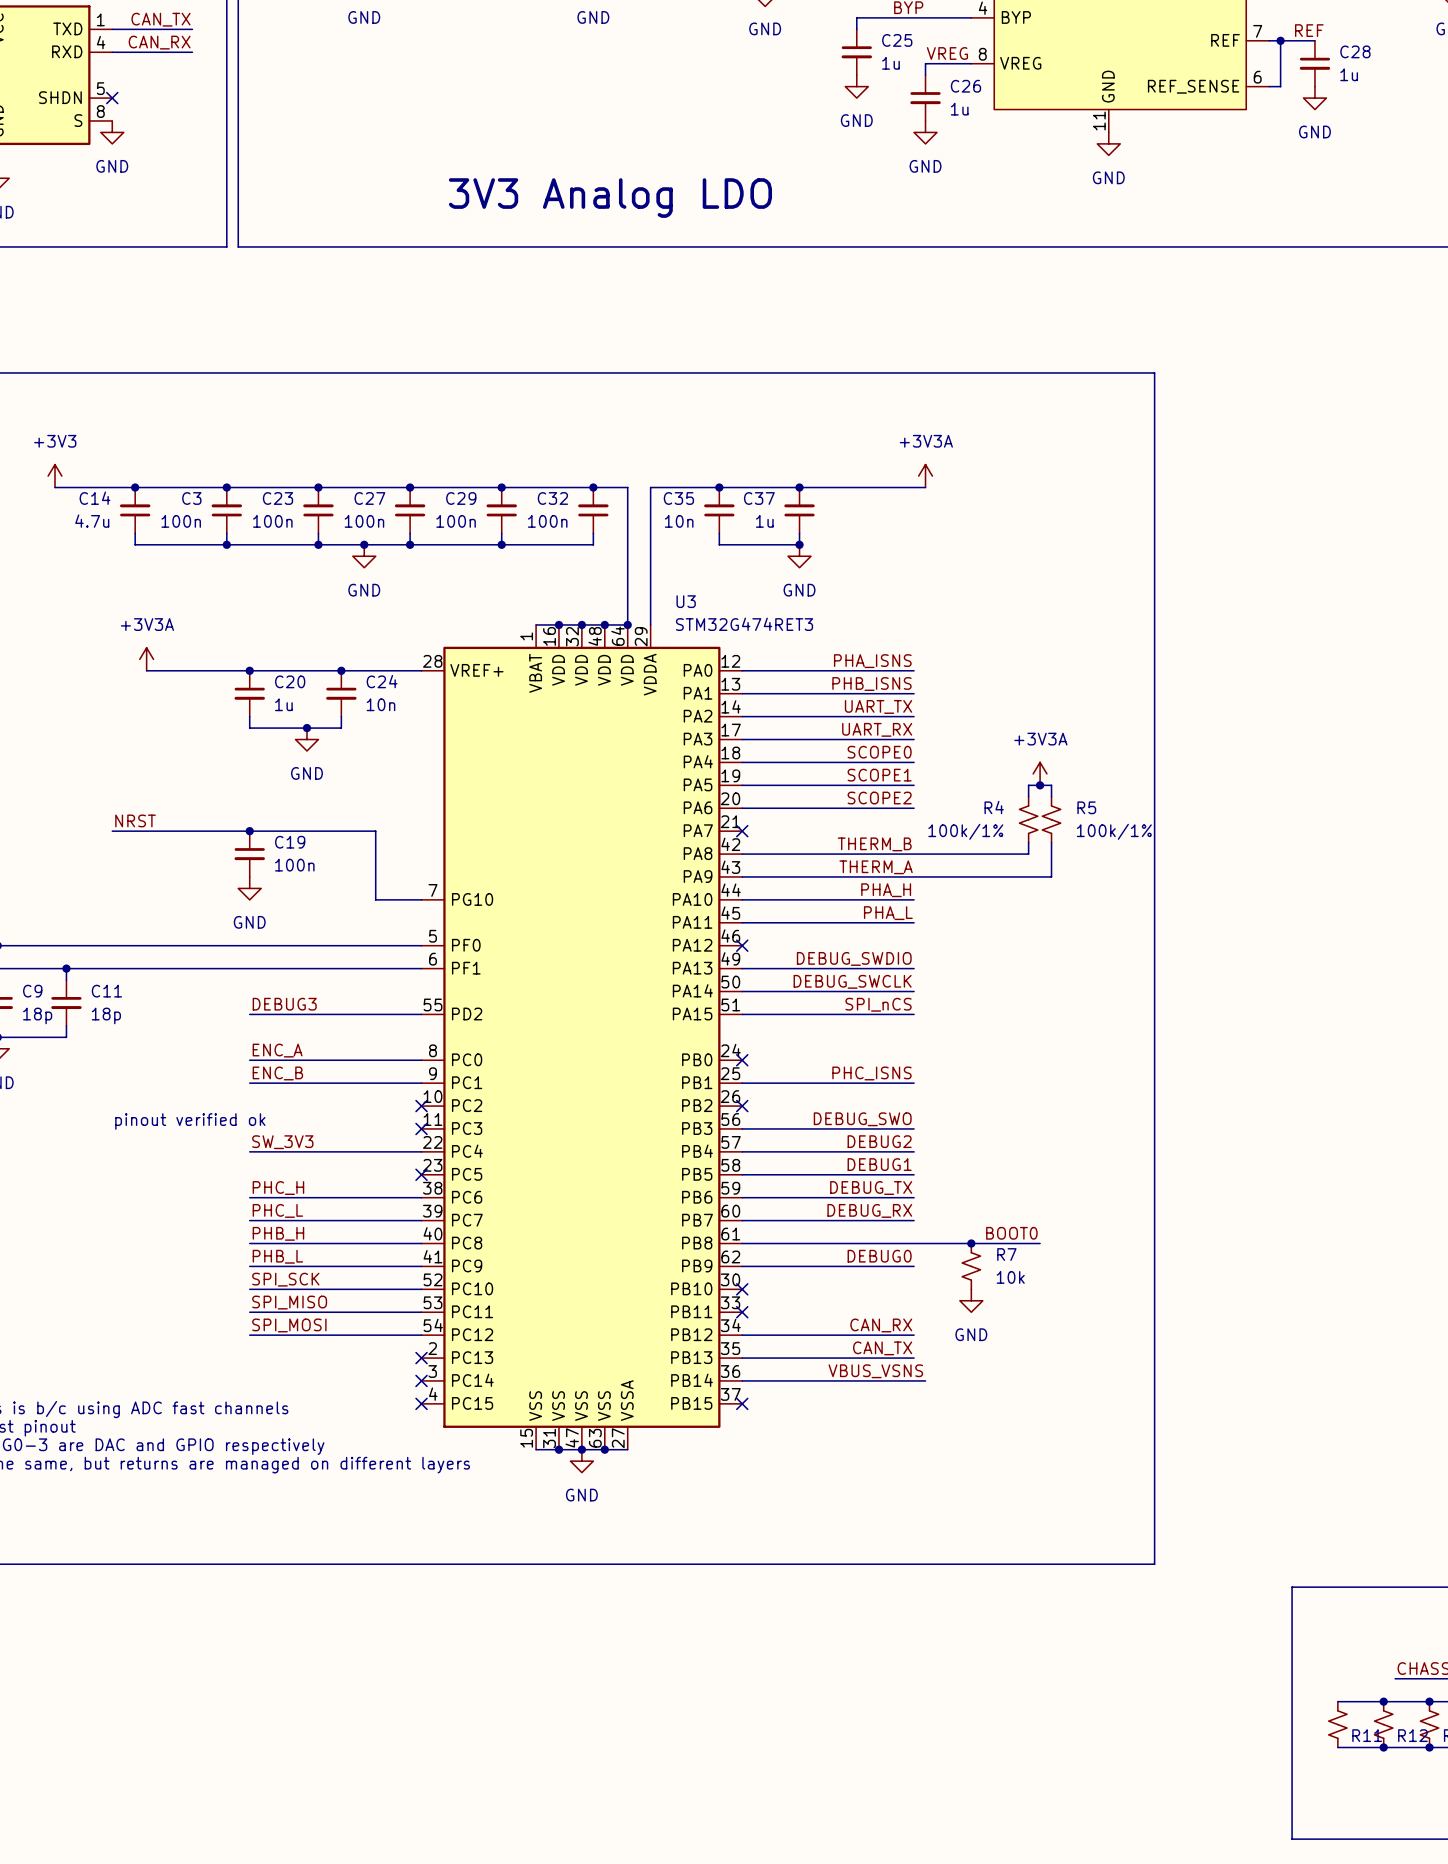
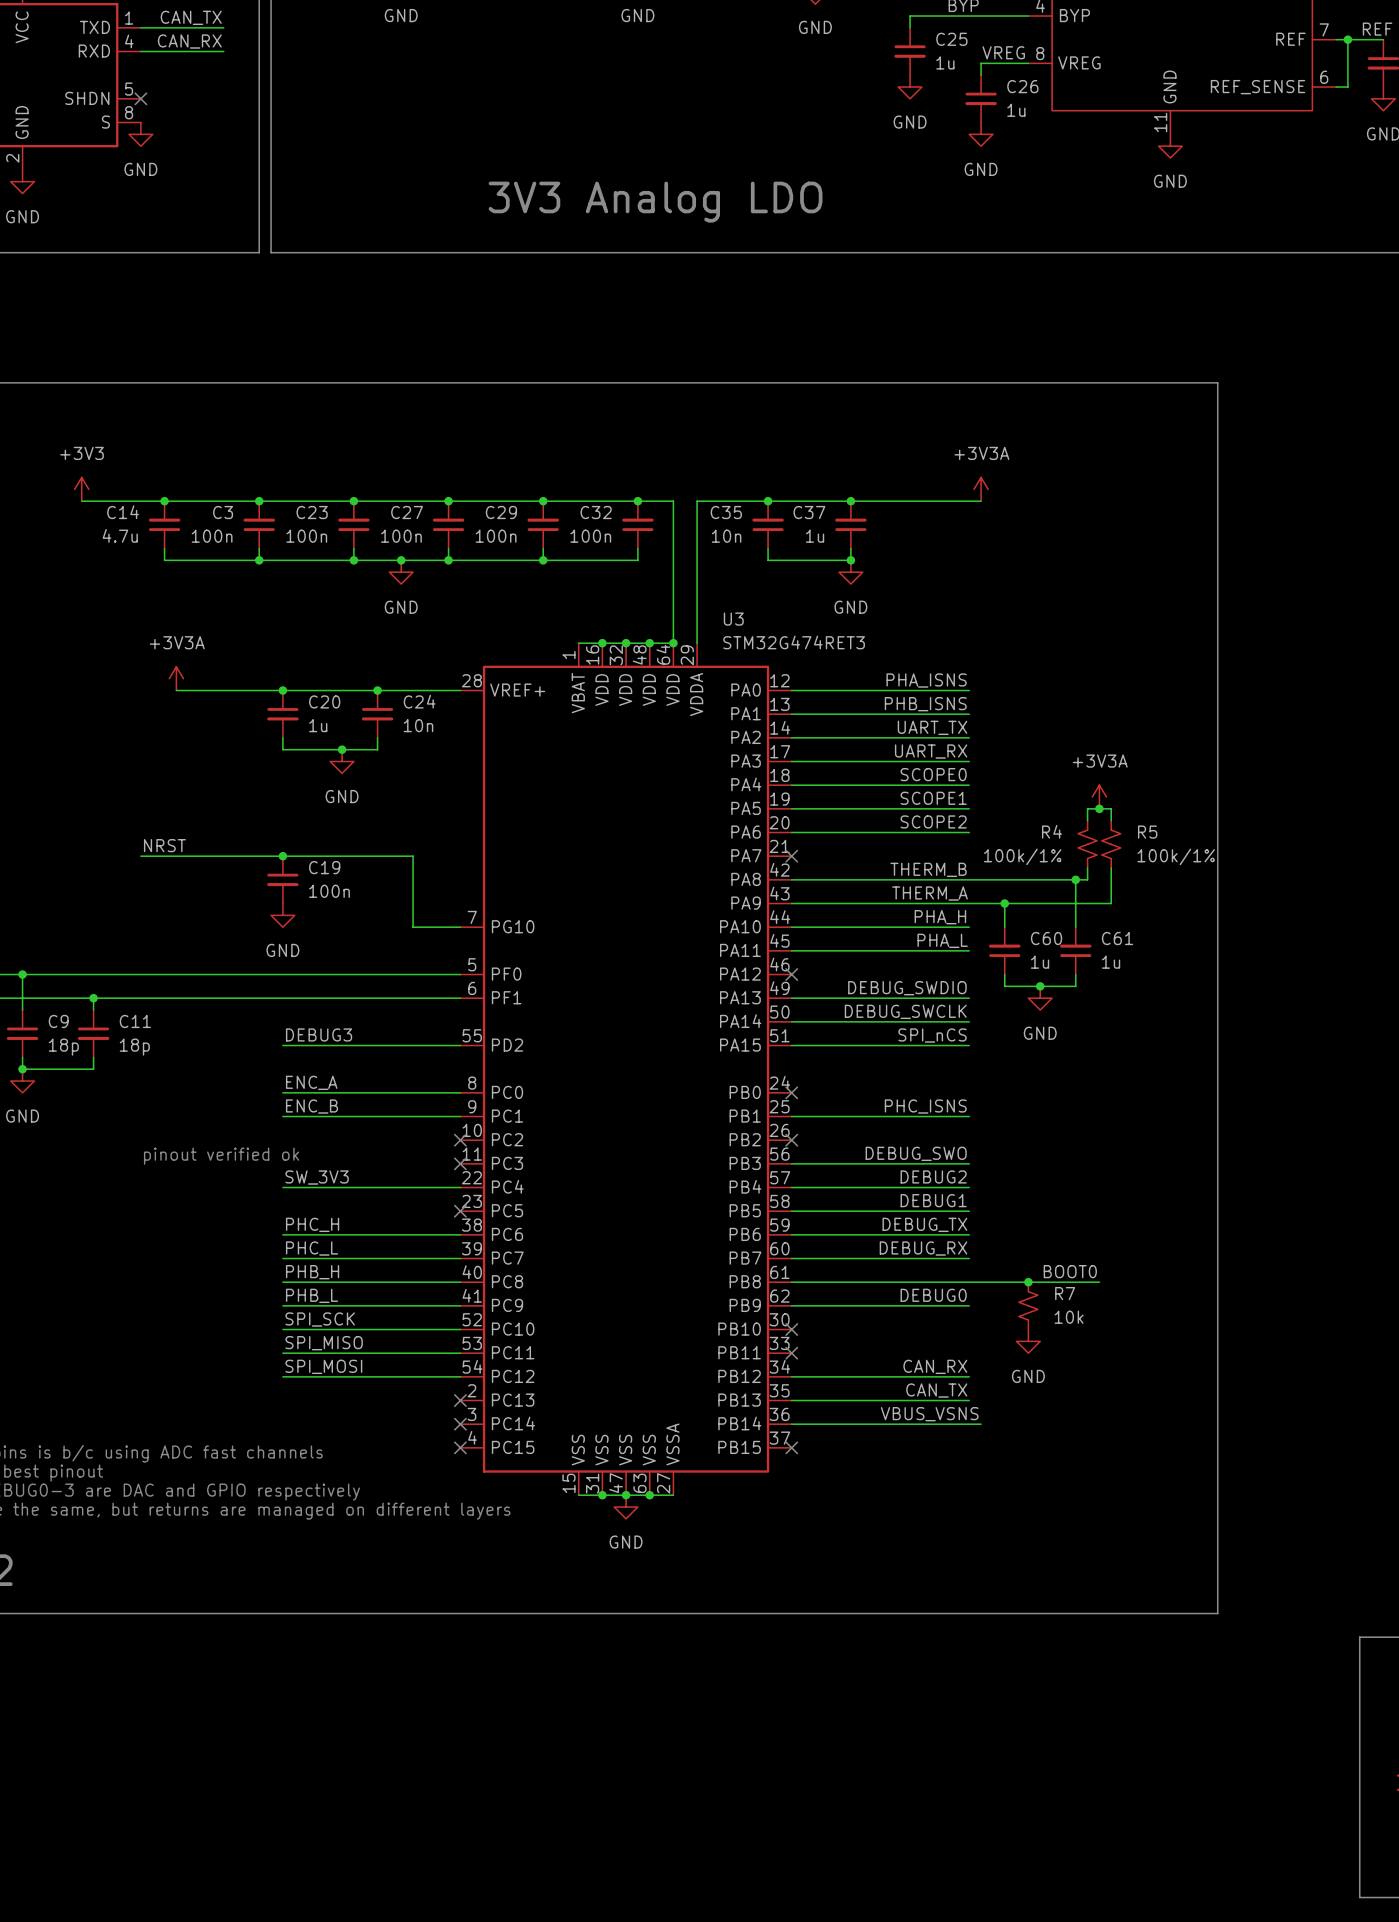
wire: none -> (1075, 879) (1075, 927)
junction: none -> (1075, 879)
wire: none -> (1004, 903) (1004, 927)
junction: none -> (1004, 903)
C60: none -> 1u (1004, 950)
C61: none -> 1u (1075, 950)
wire: none -> (1004, 974) (1004, 986) (1075, 986) (1075, 974)
junction: none -> (1040, 986)
power symbol: none -> GND (1040, 998)

